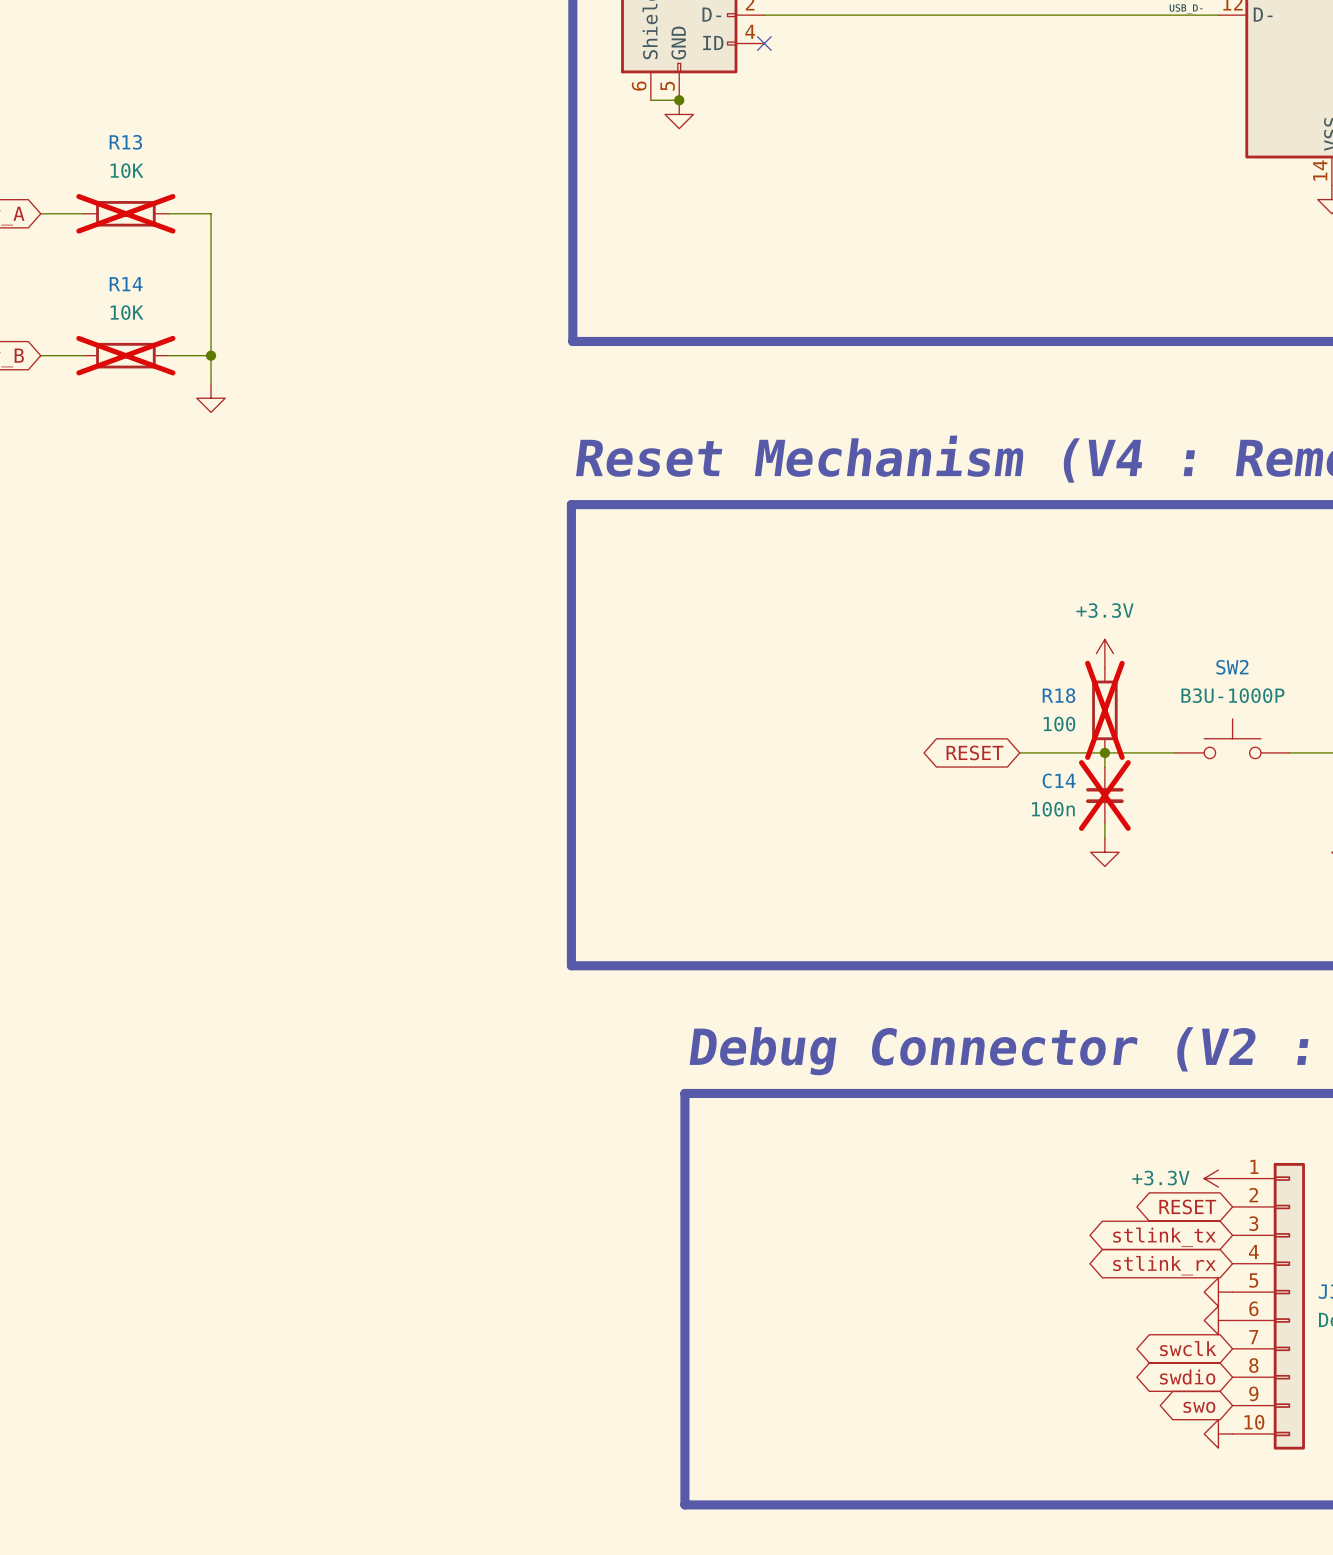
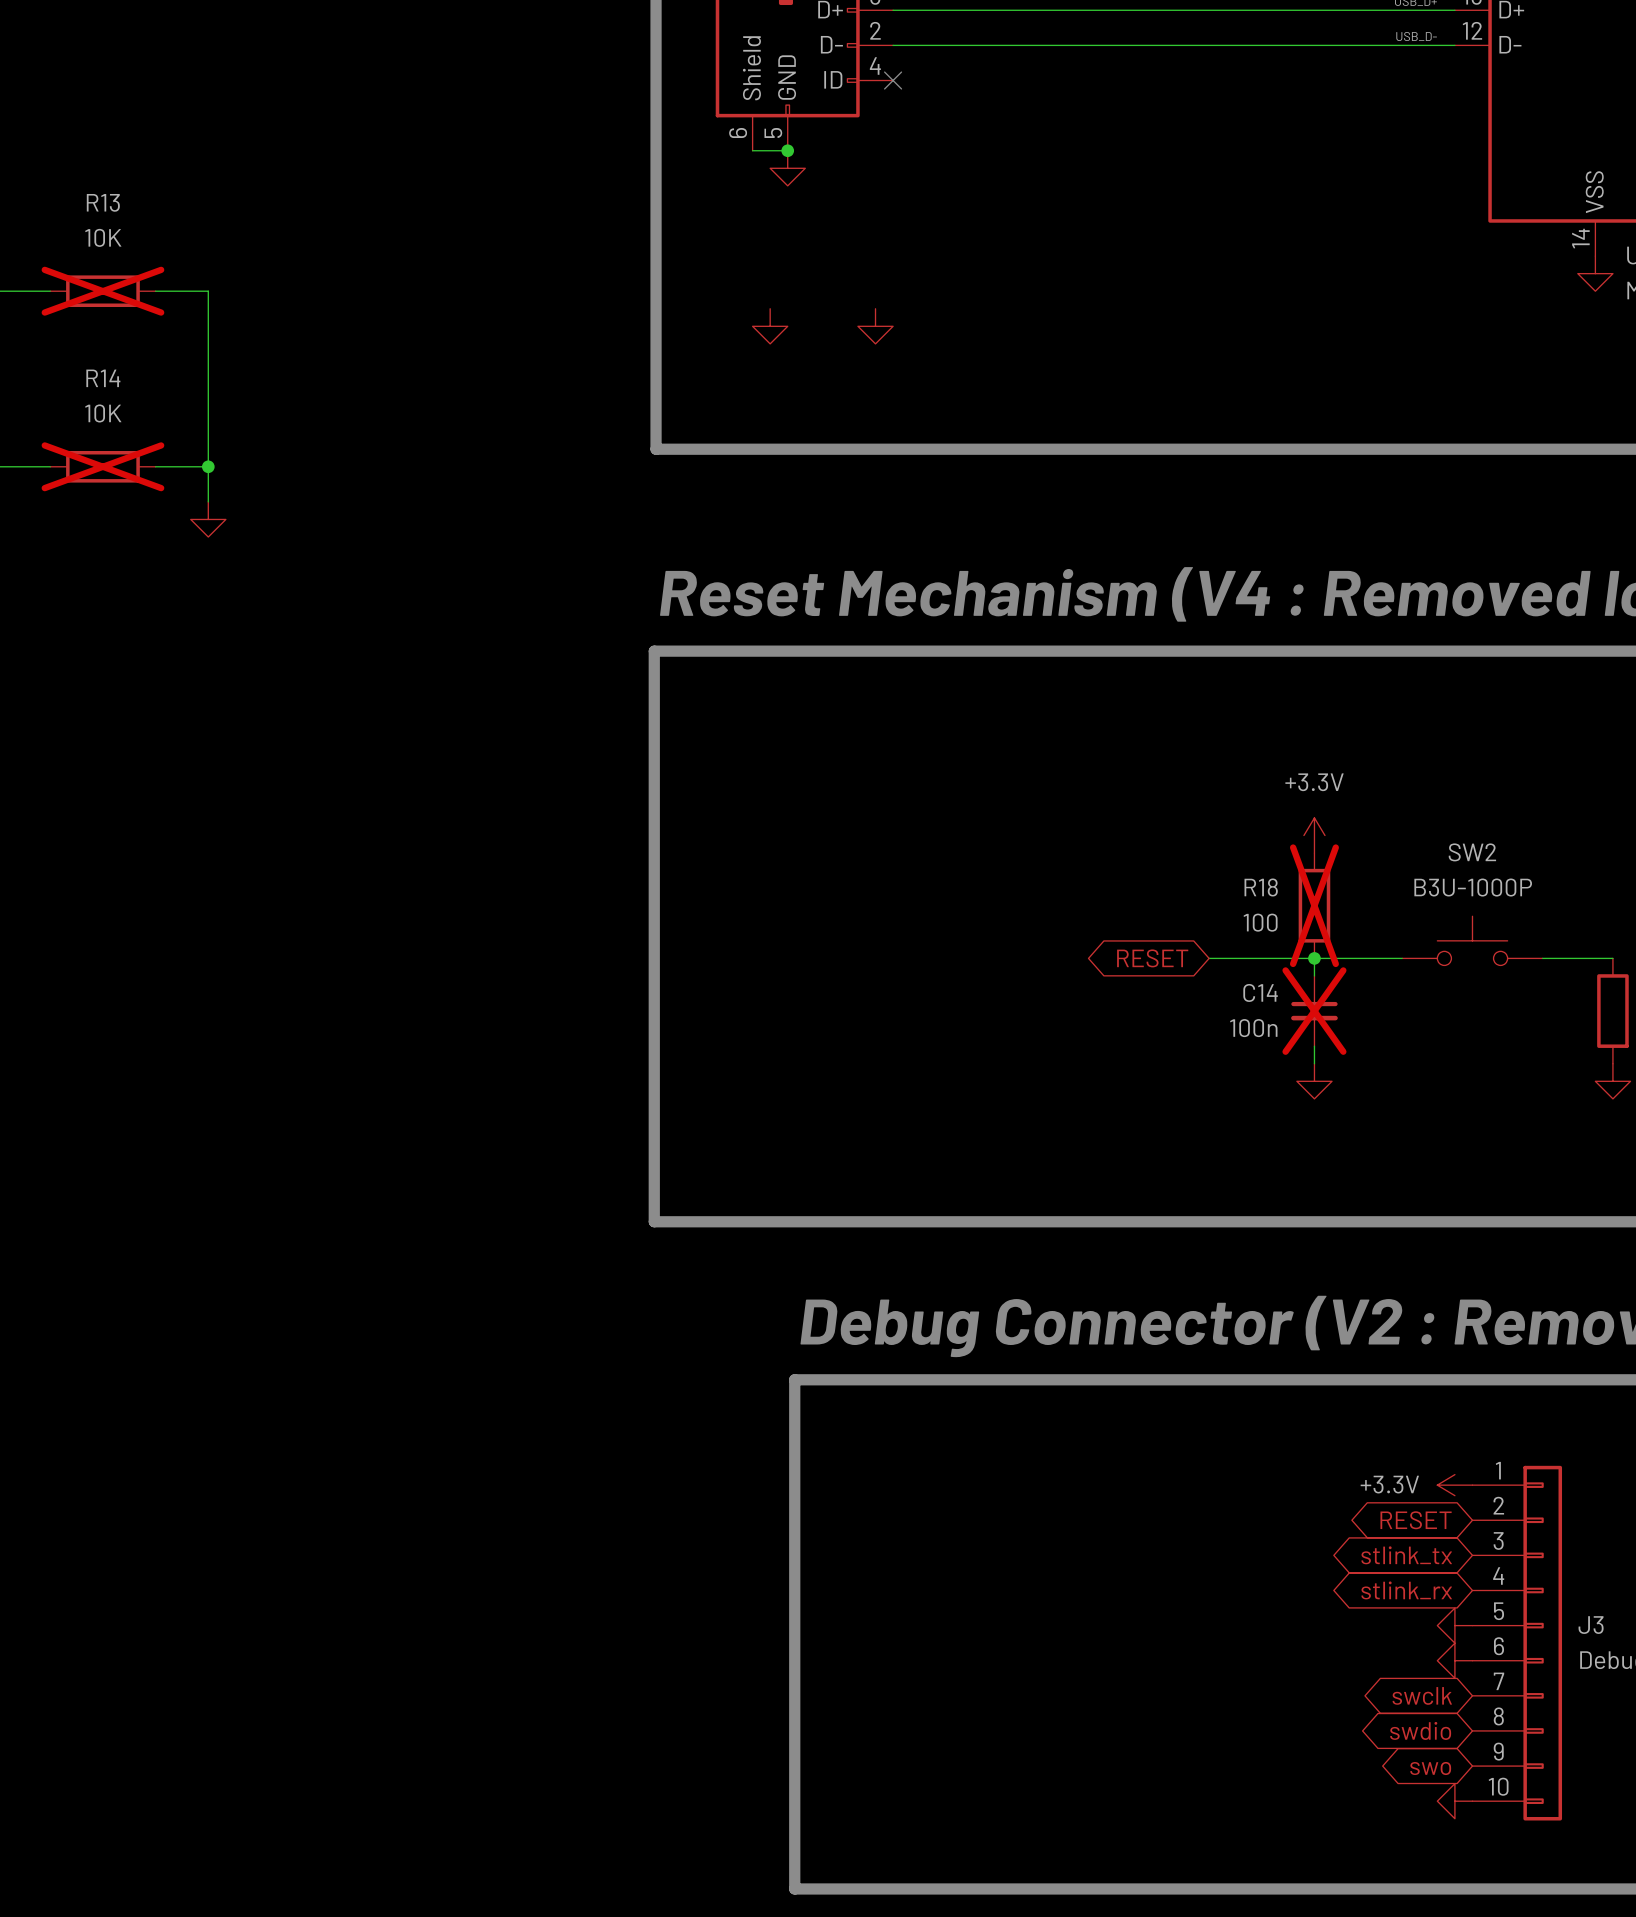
power symbol: none -> (770, 326)
power symbol: none -> (875, 326)

